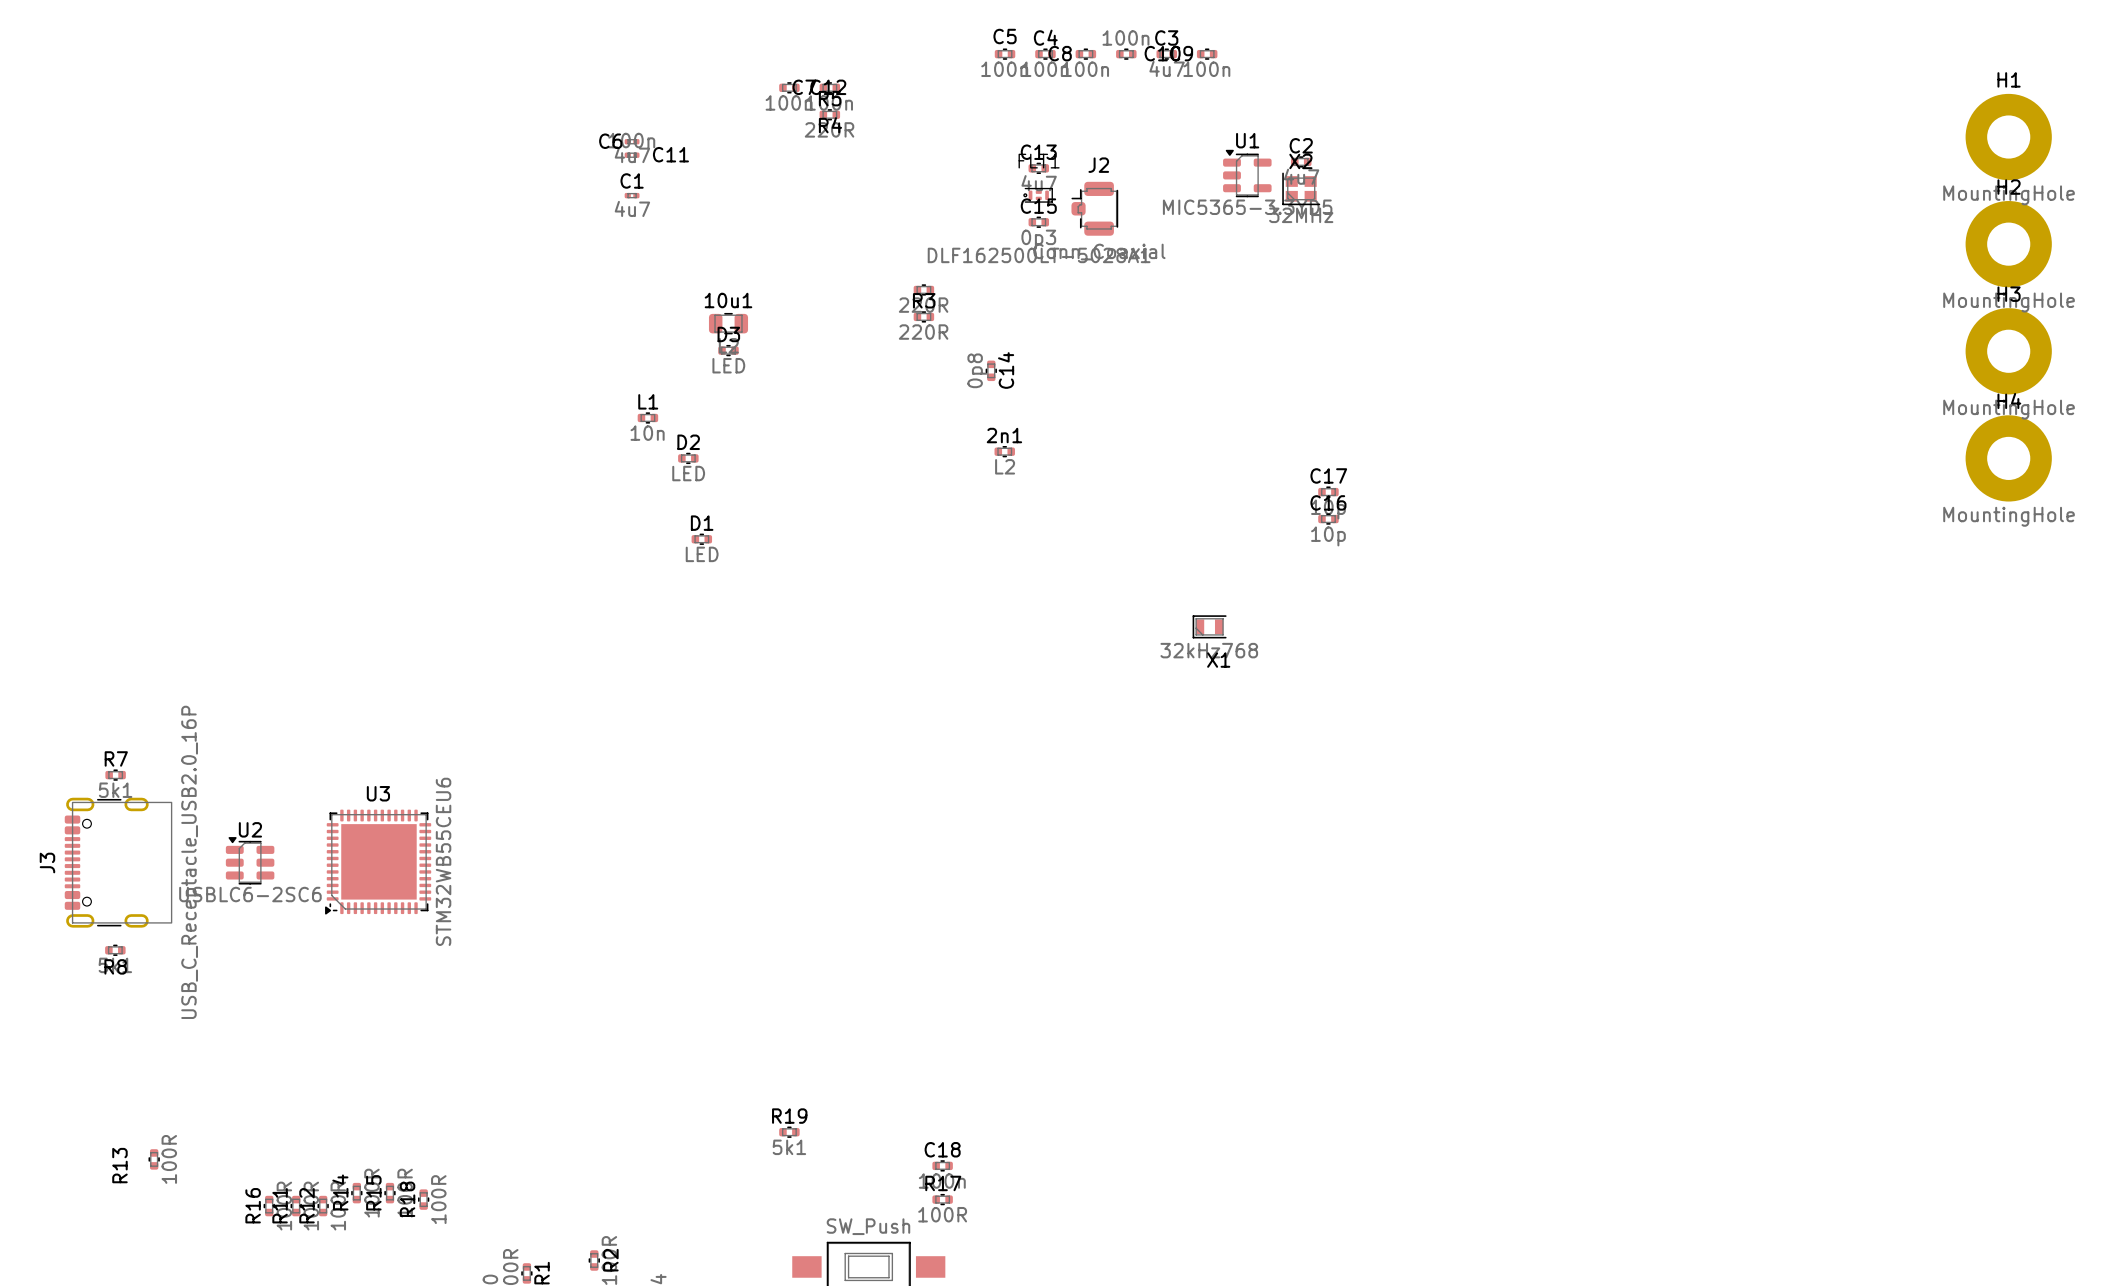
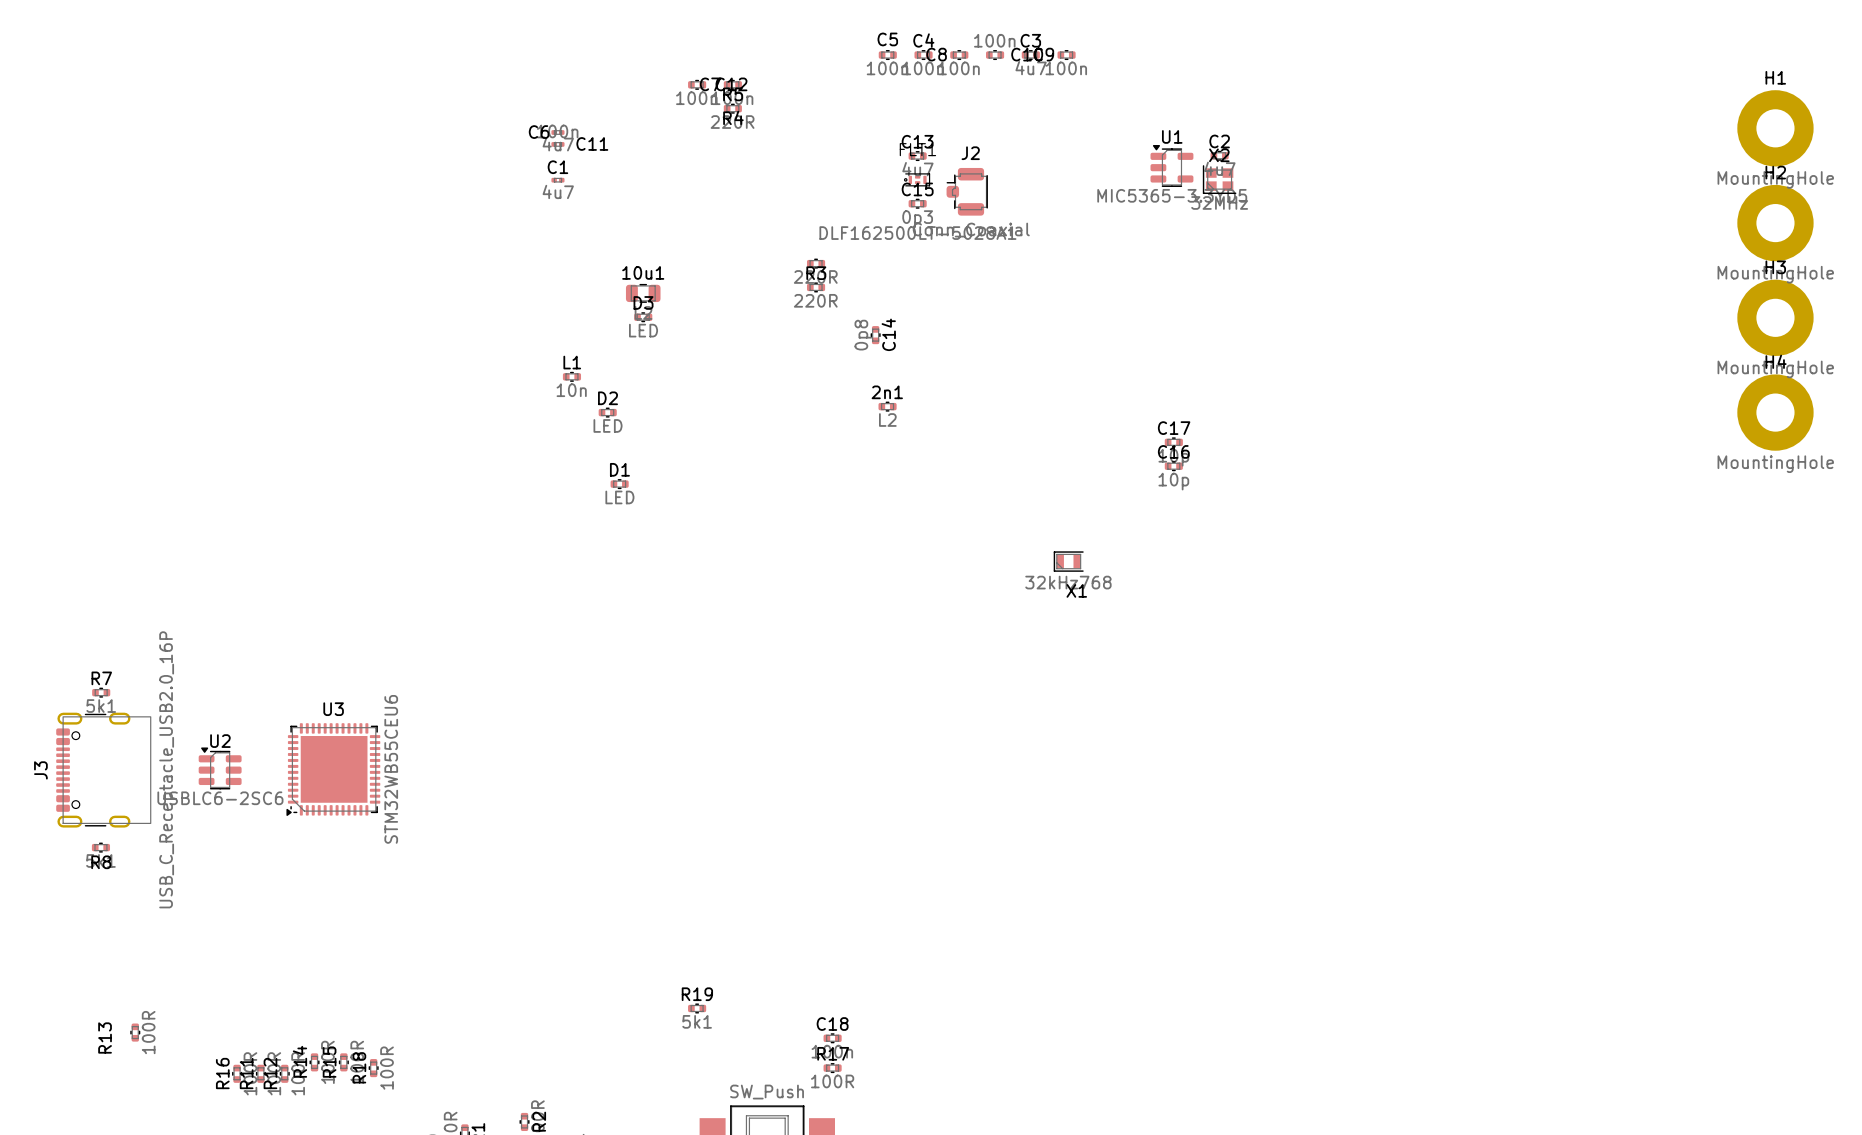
C2 position: (1301, 161) -> (1219, 155)
U1 position: (1247, 173) -> (1171, 165)
X2 position: (1301, 188) -> (1219, 179)

